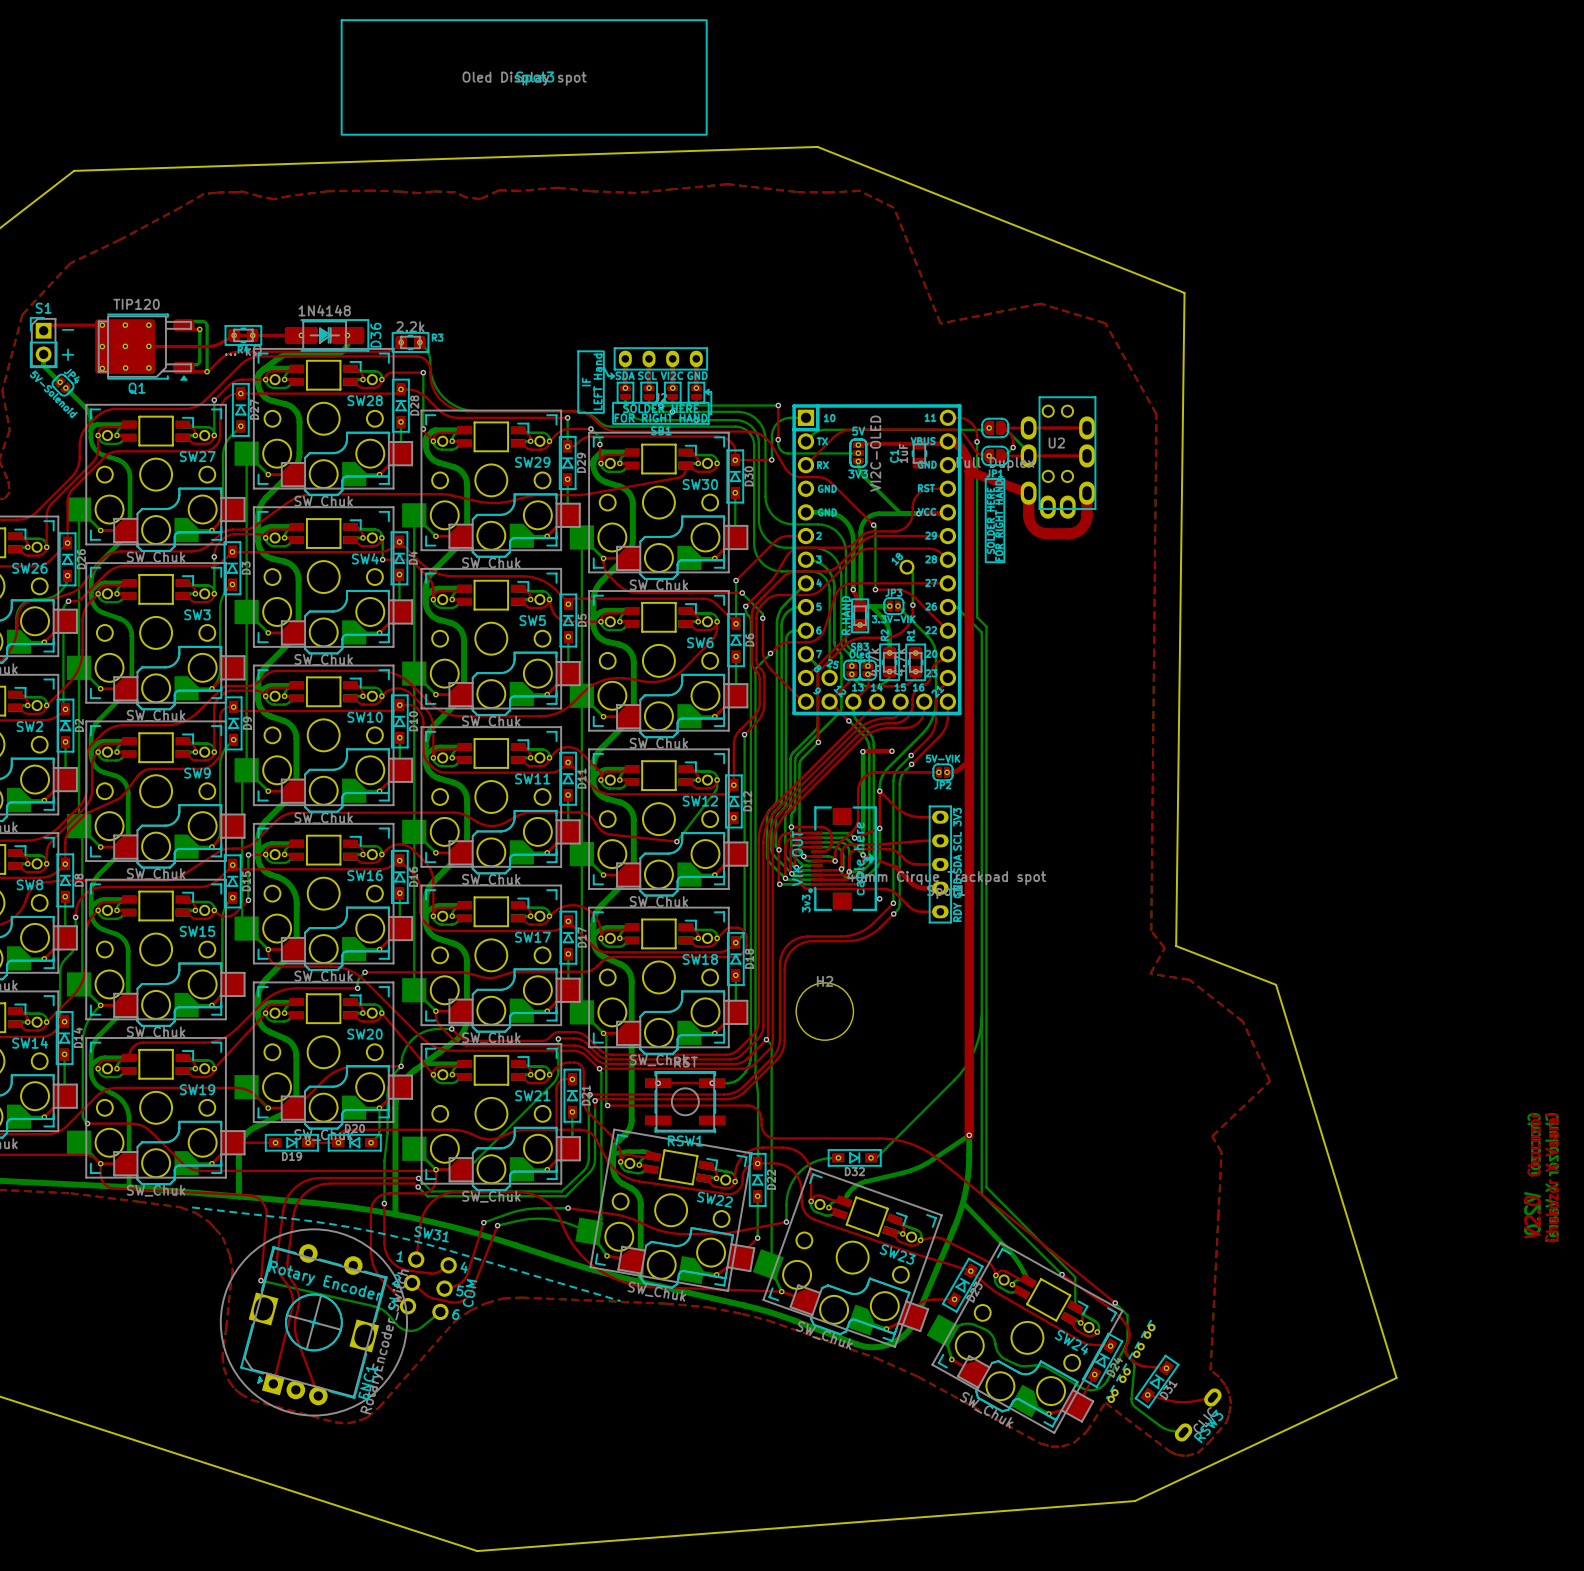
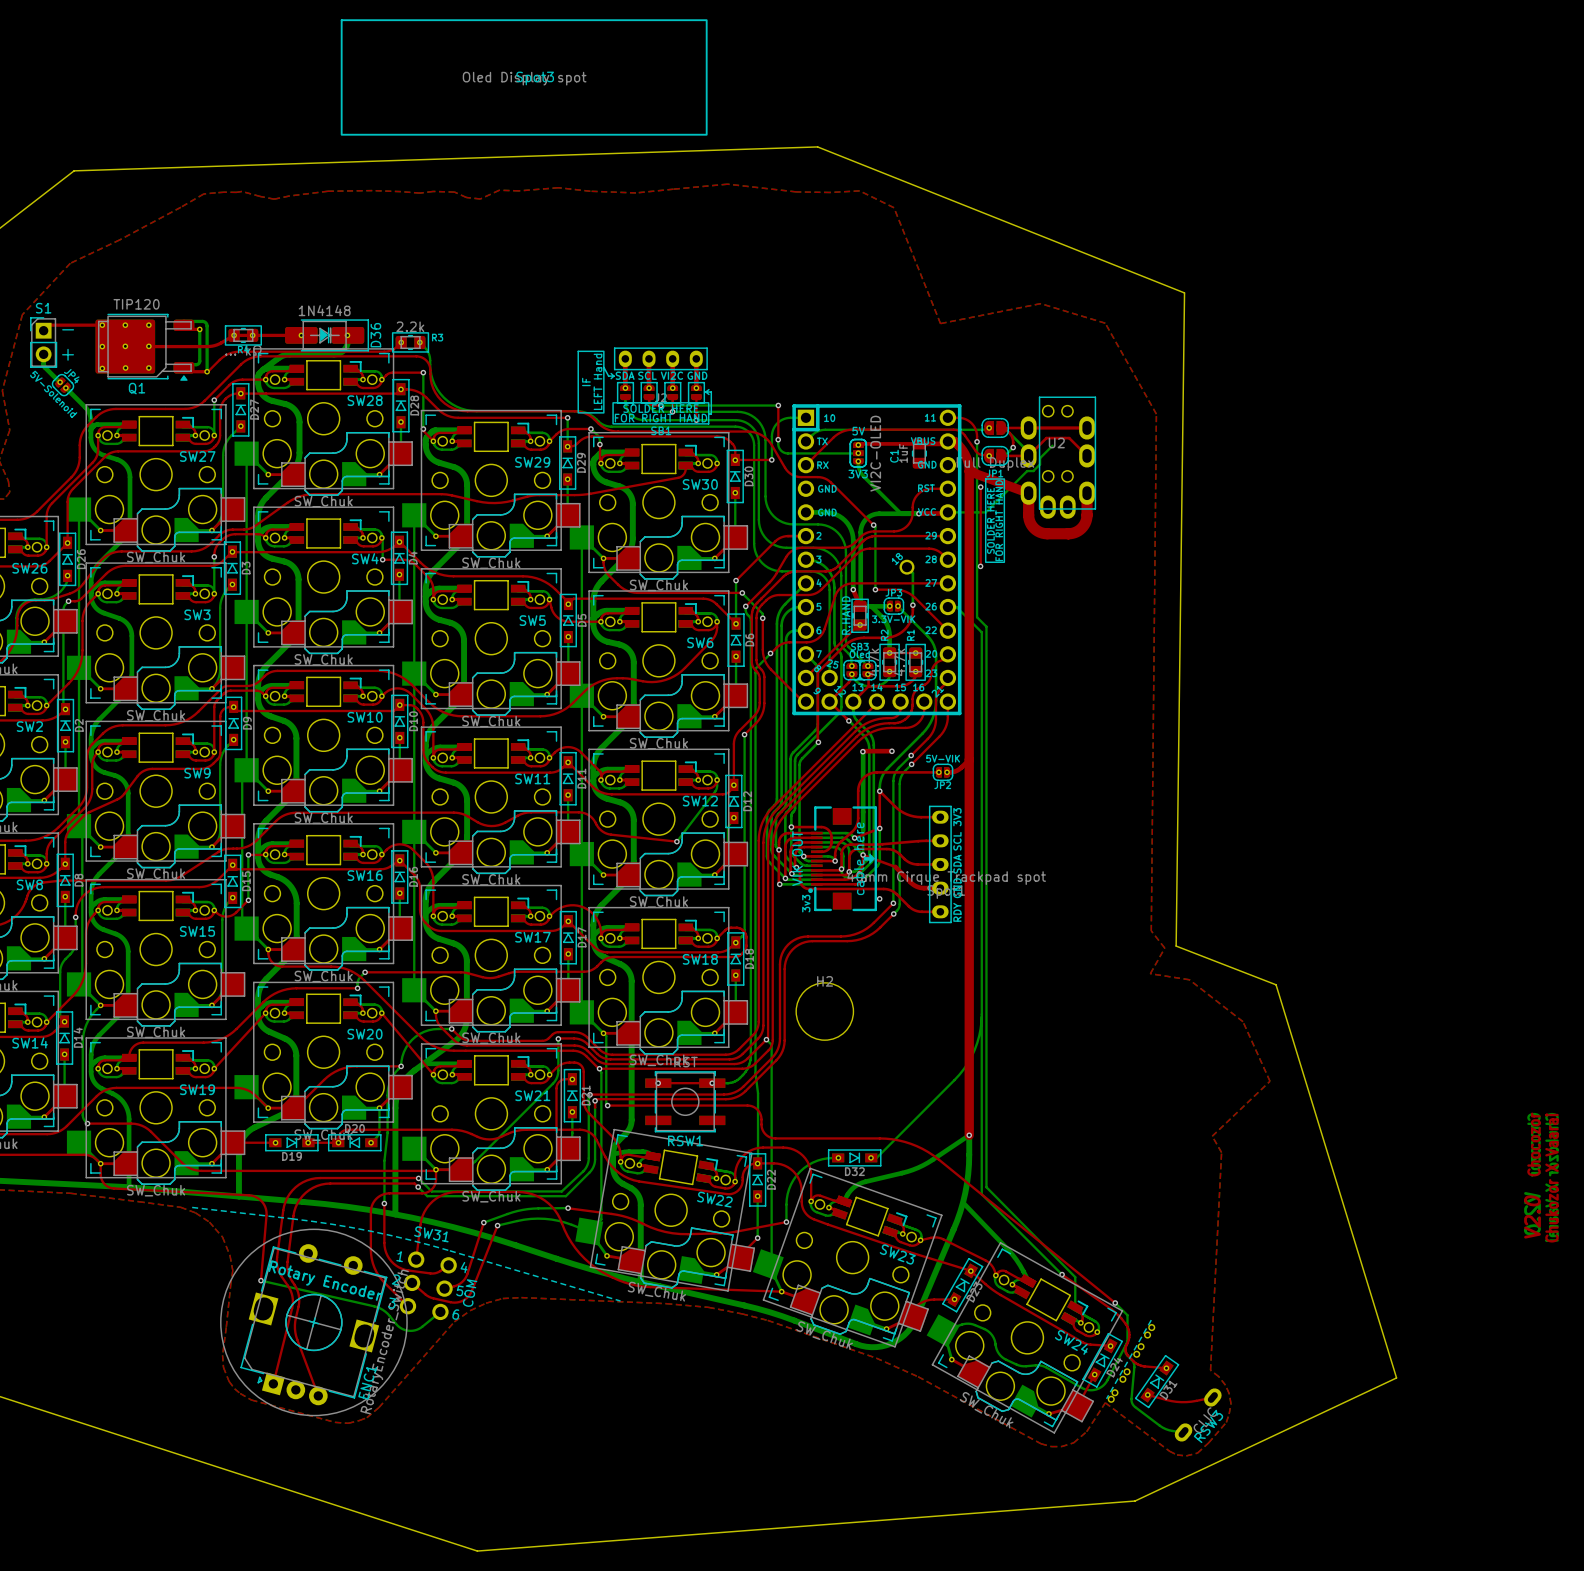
bottom track: none -> (1052, 445) (1040, 458) (1040, 464) (1033, 471) (1027, 471) (985, 512) (947, 512)
top track: (1028, 455) (1087, 455) -> (1028, 455) (1046, 438) (1069, 438) (1087, 455)
top track: none -> (980, 487) (980, 566)
via: none -> (980, 487)
via: none -> (980, 566)

